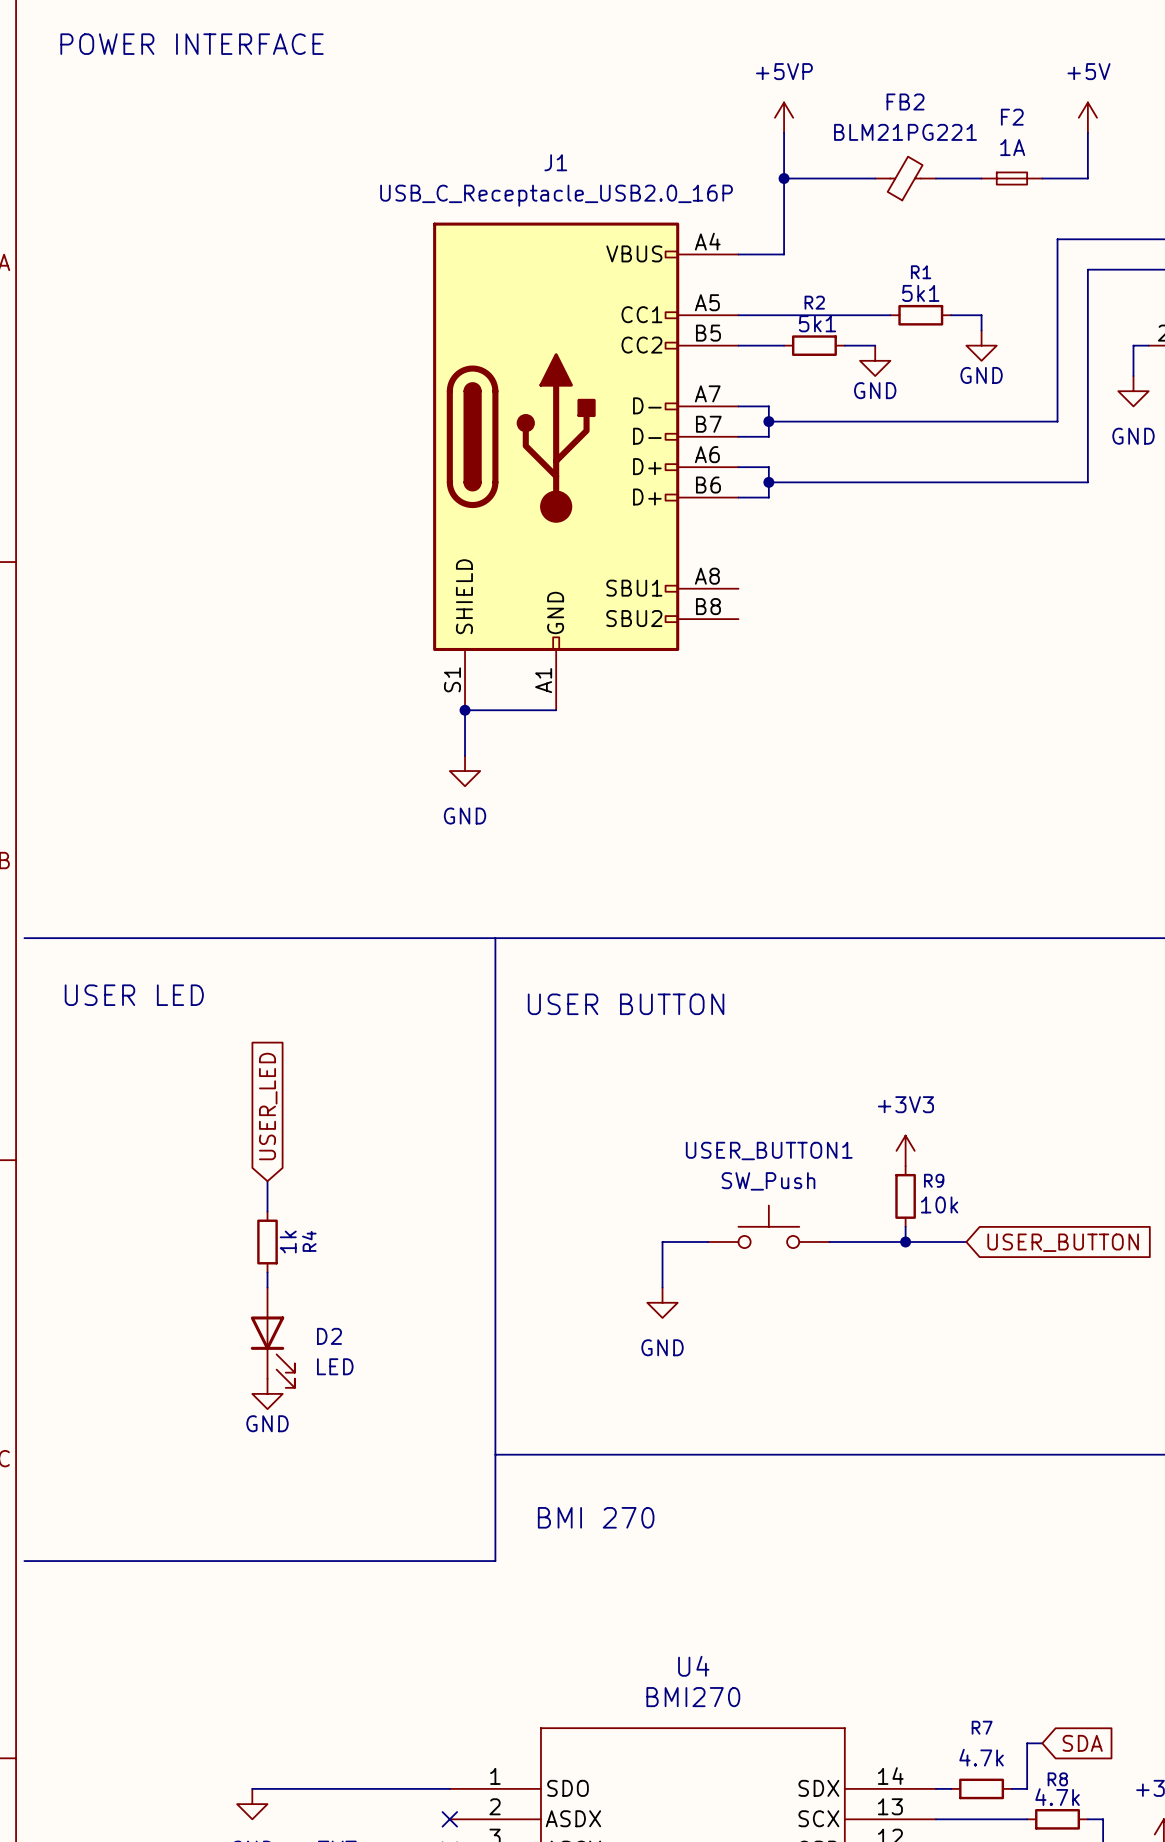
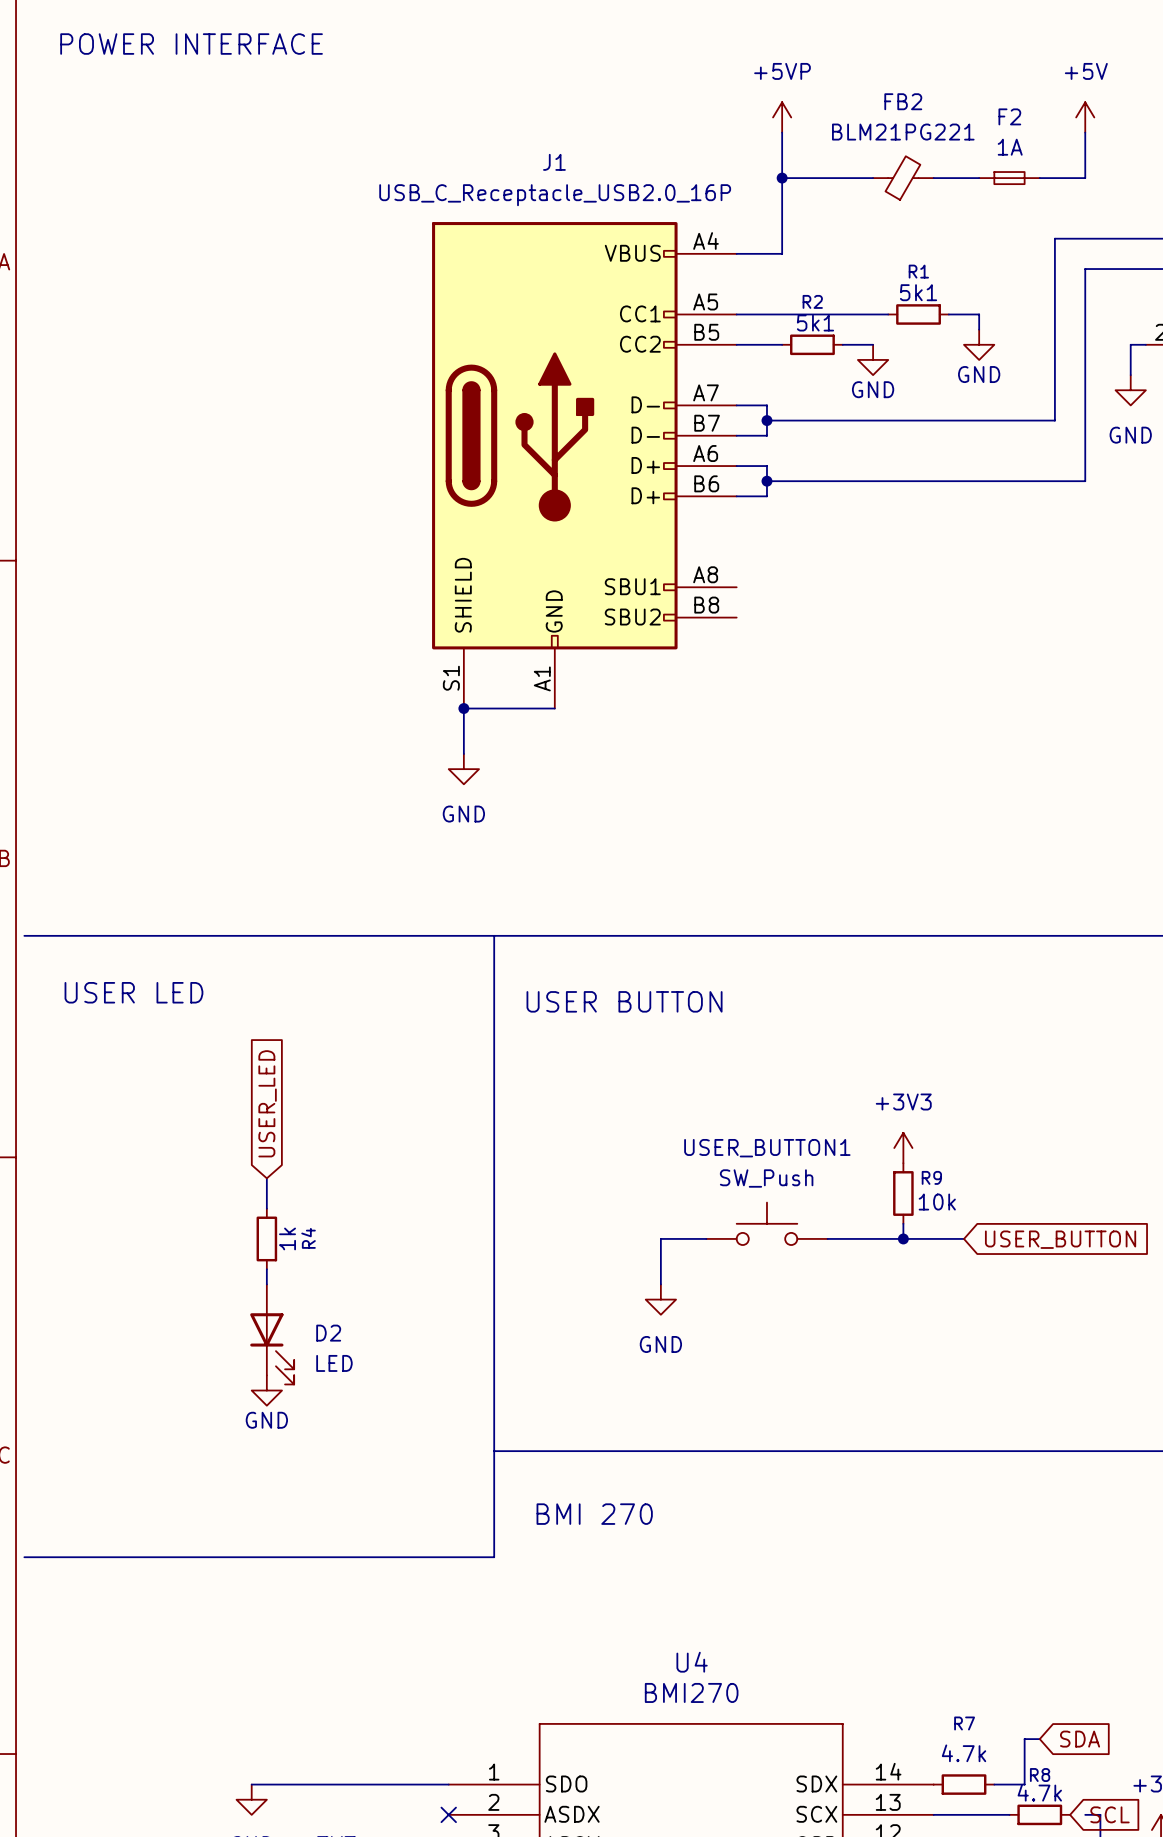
R7 position: (981, 1788) -> (964, 1784)
R8 position: (1057, 1819) -> (1039, 1814)
global label: none -> SCL (1109, 1814)

